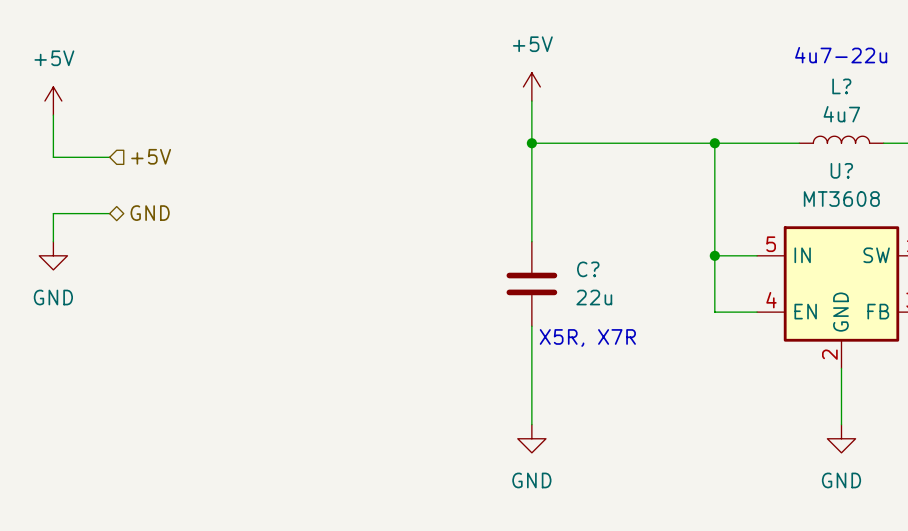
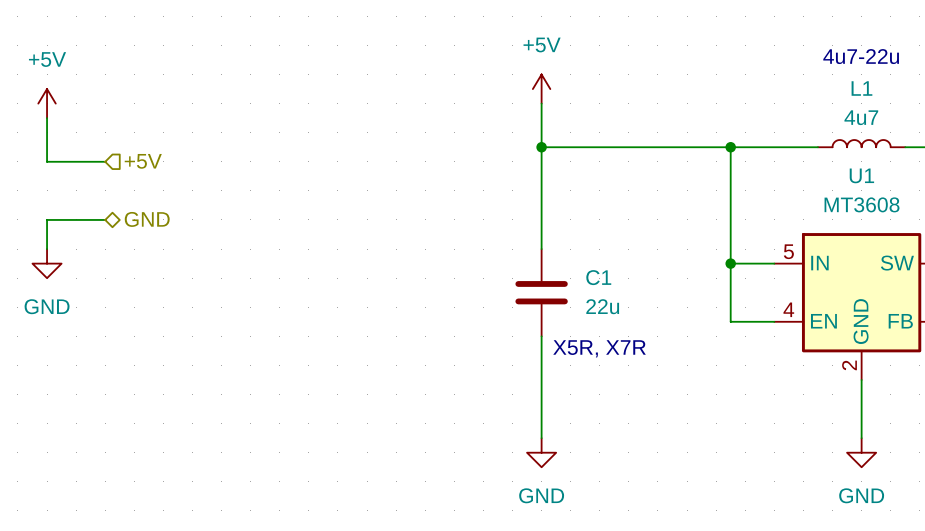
L? name: L? (841, 86) -> L1 (861, 88)
U? name: U? (841, 170) -> U1 (861, 175)
C? name: C? (588, 269) -> C1 (598, 277)

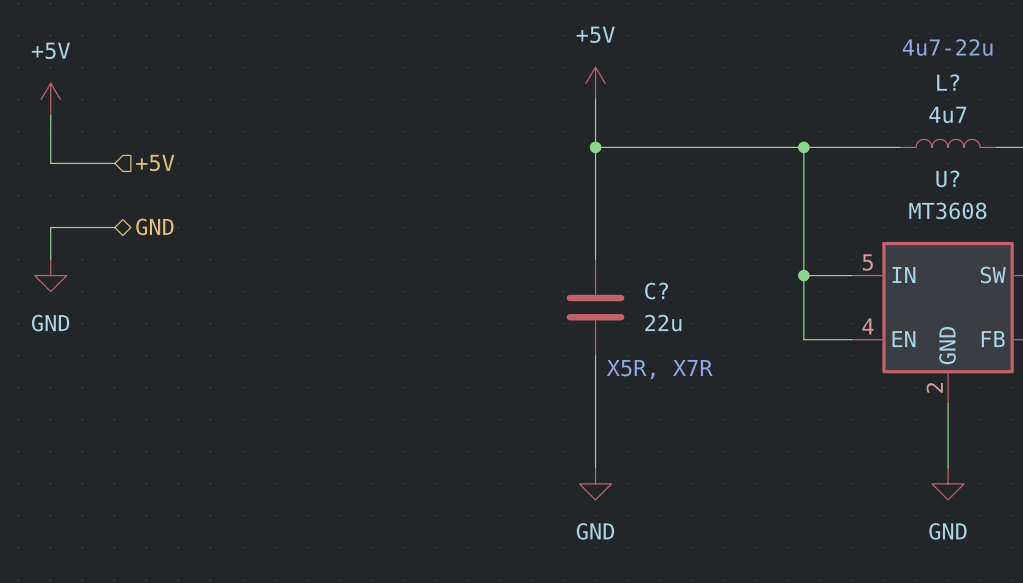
L1 name: L1 (861, 88) -> L? (948, 82)
U1 name: U1 (861, 175) -> U? (947, 178)
C1 name: C1 (598, 277) -> C? (656, 291)

